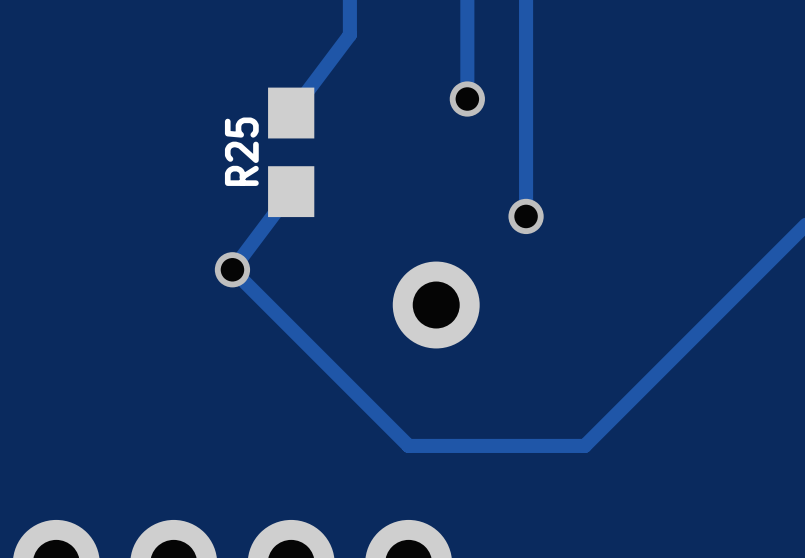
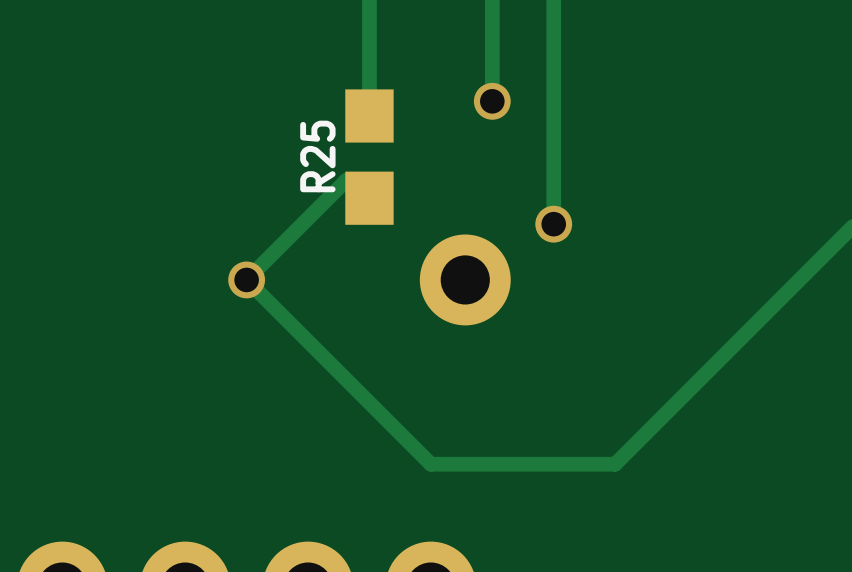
track: (349, 34) (291, 113) -> (369, 34) (369, 115)
R25 position: (291, 152) -> (369, 157)
track: (291, 191) (232, 269) -> (369, 198) (345, 180) (246, 279)
part position: (436, 305) -> (465, 279)

